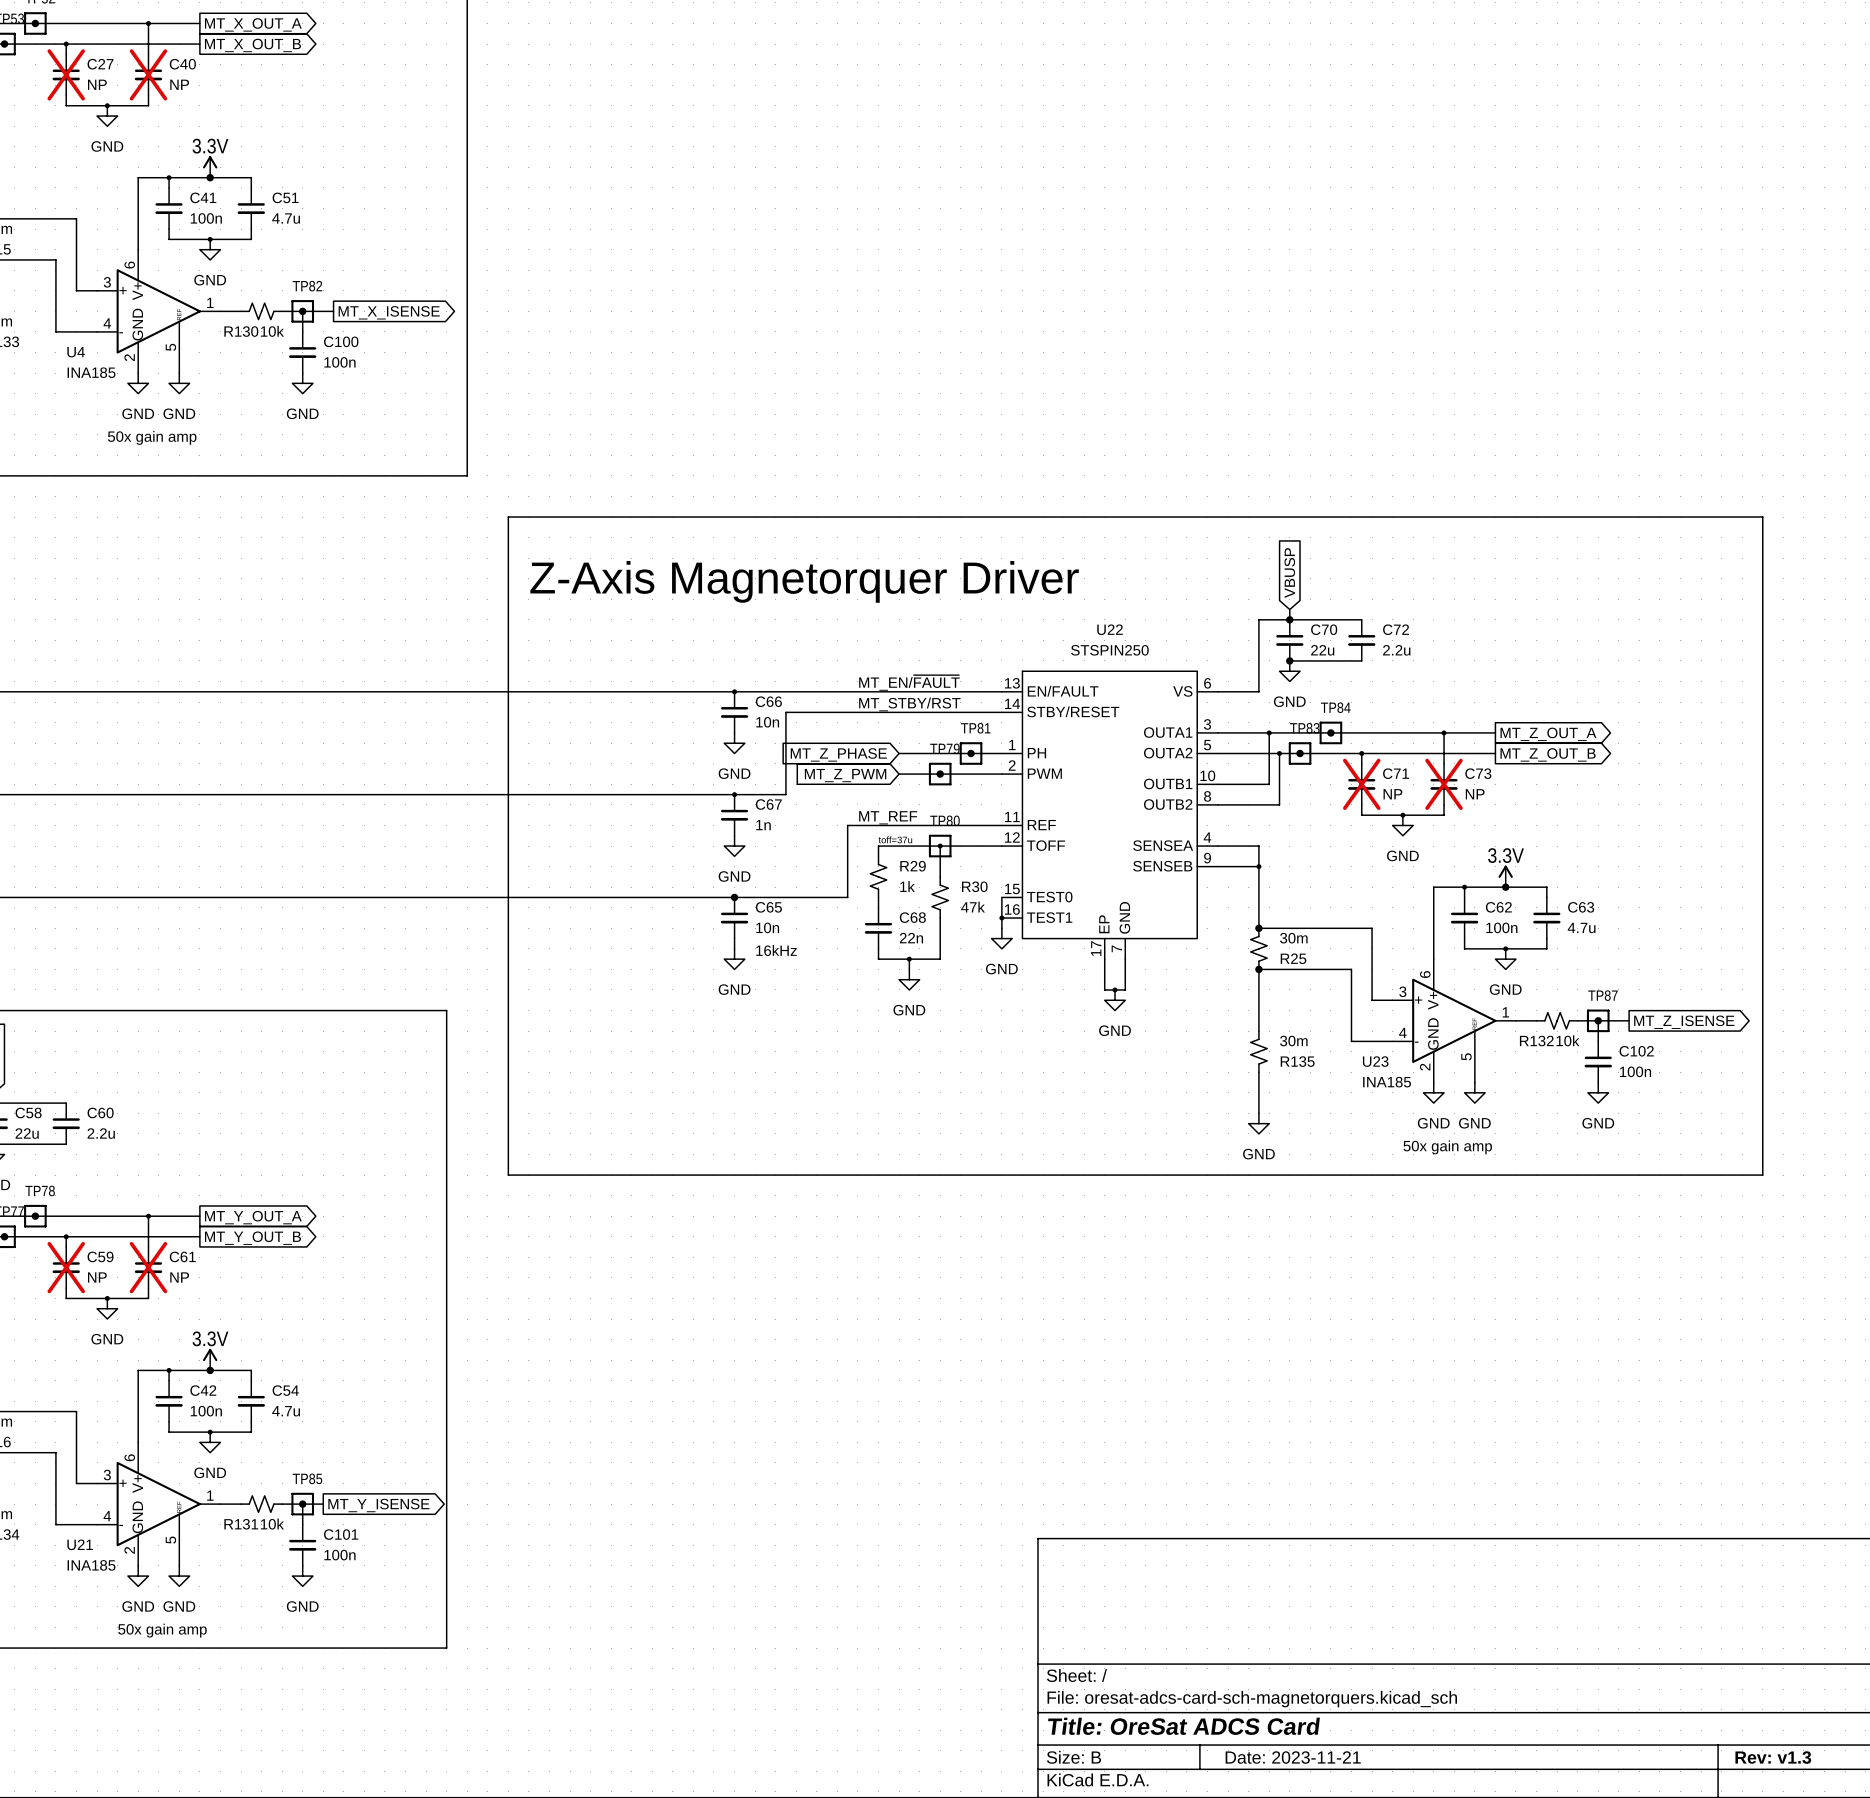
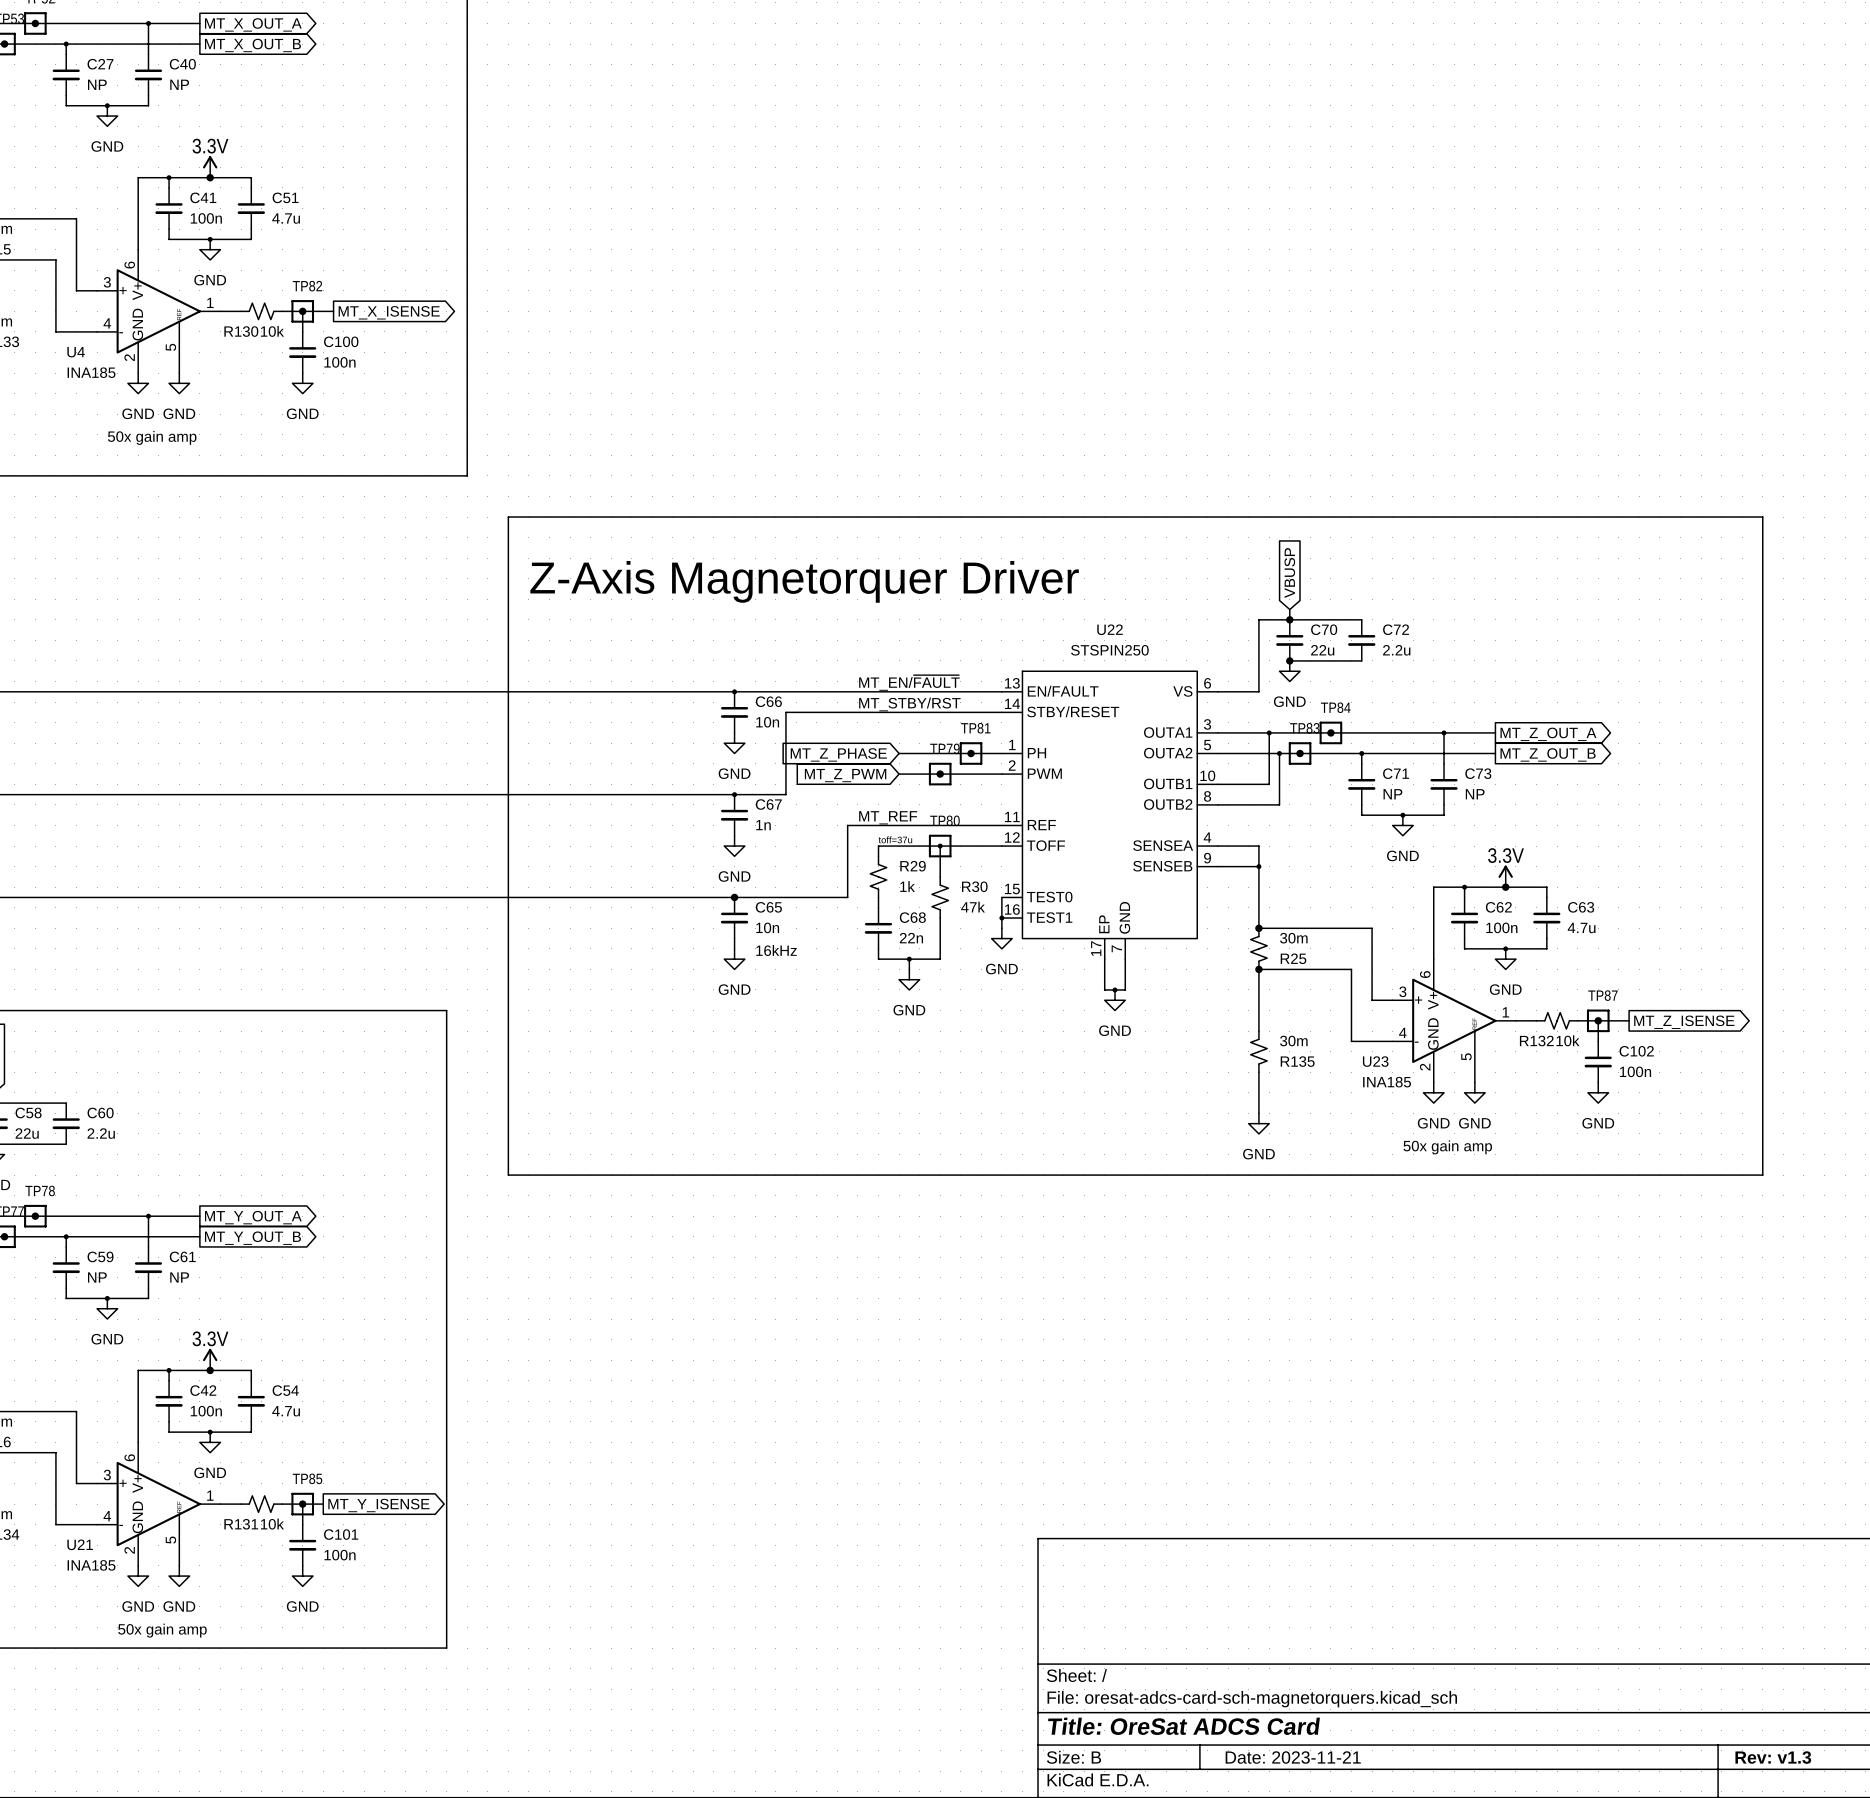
C27 do-not-place cross: (66, 74) -> none
C40 do-not-place cross: (148, 74) -> none
C71 do-not-place cross: (1361, 784) -> none
C73 do-not-place cross: (1444, 784) -> none
C59 do-not-place cross: (66, 1267) -> none
C61 do-not-place cross: (148, 1267) -> none

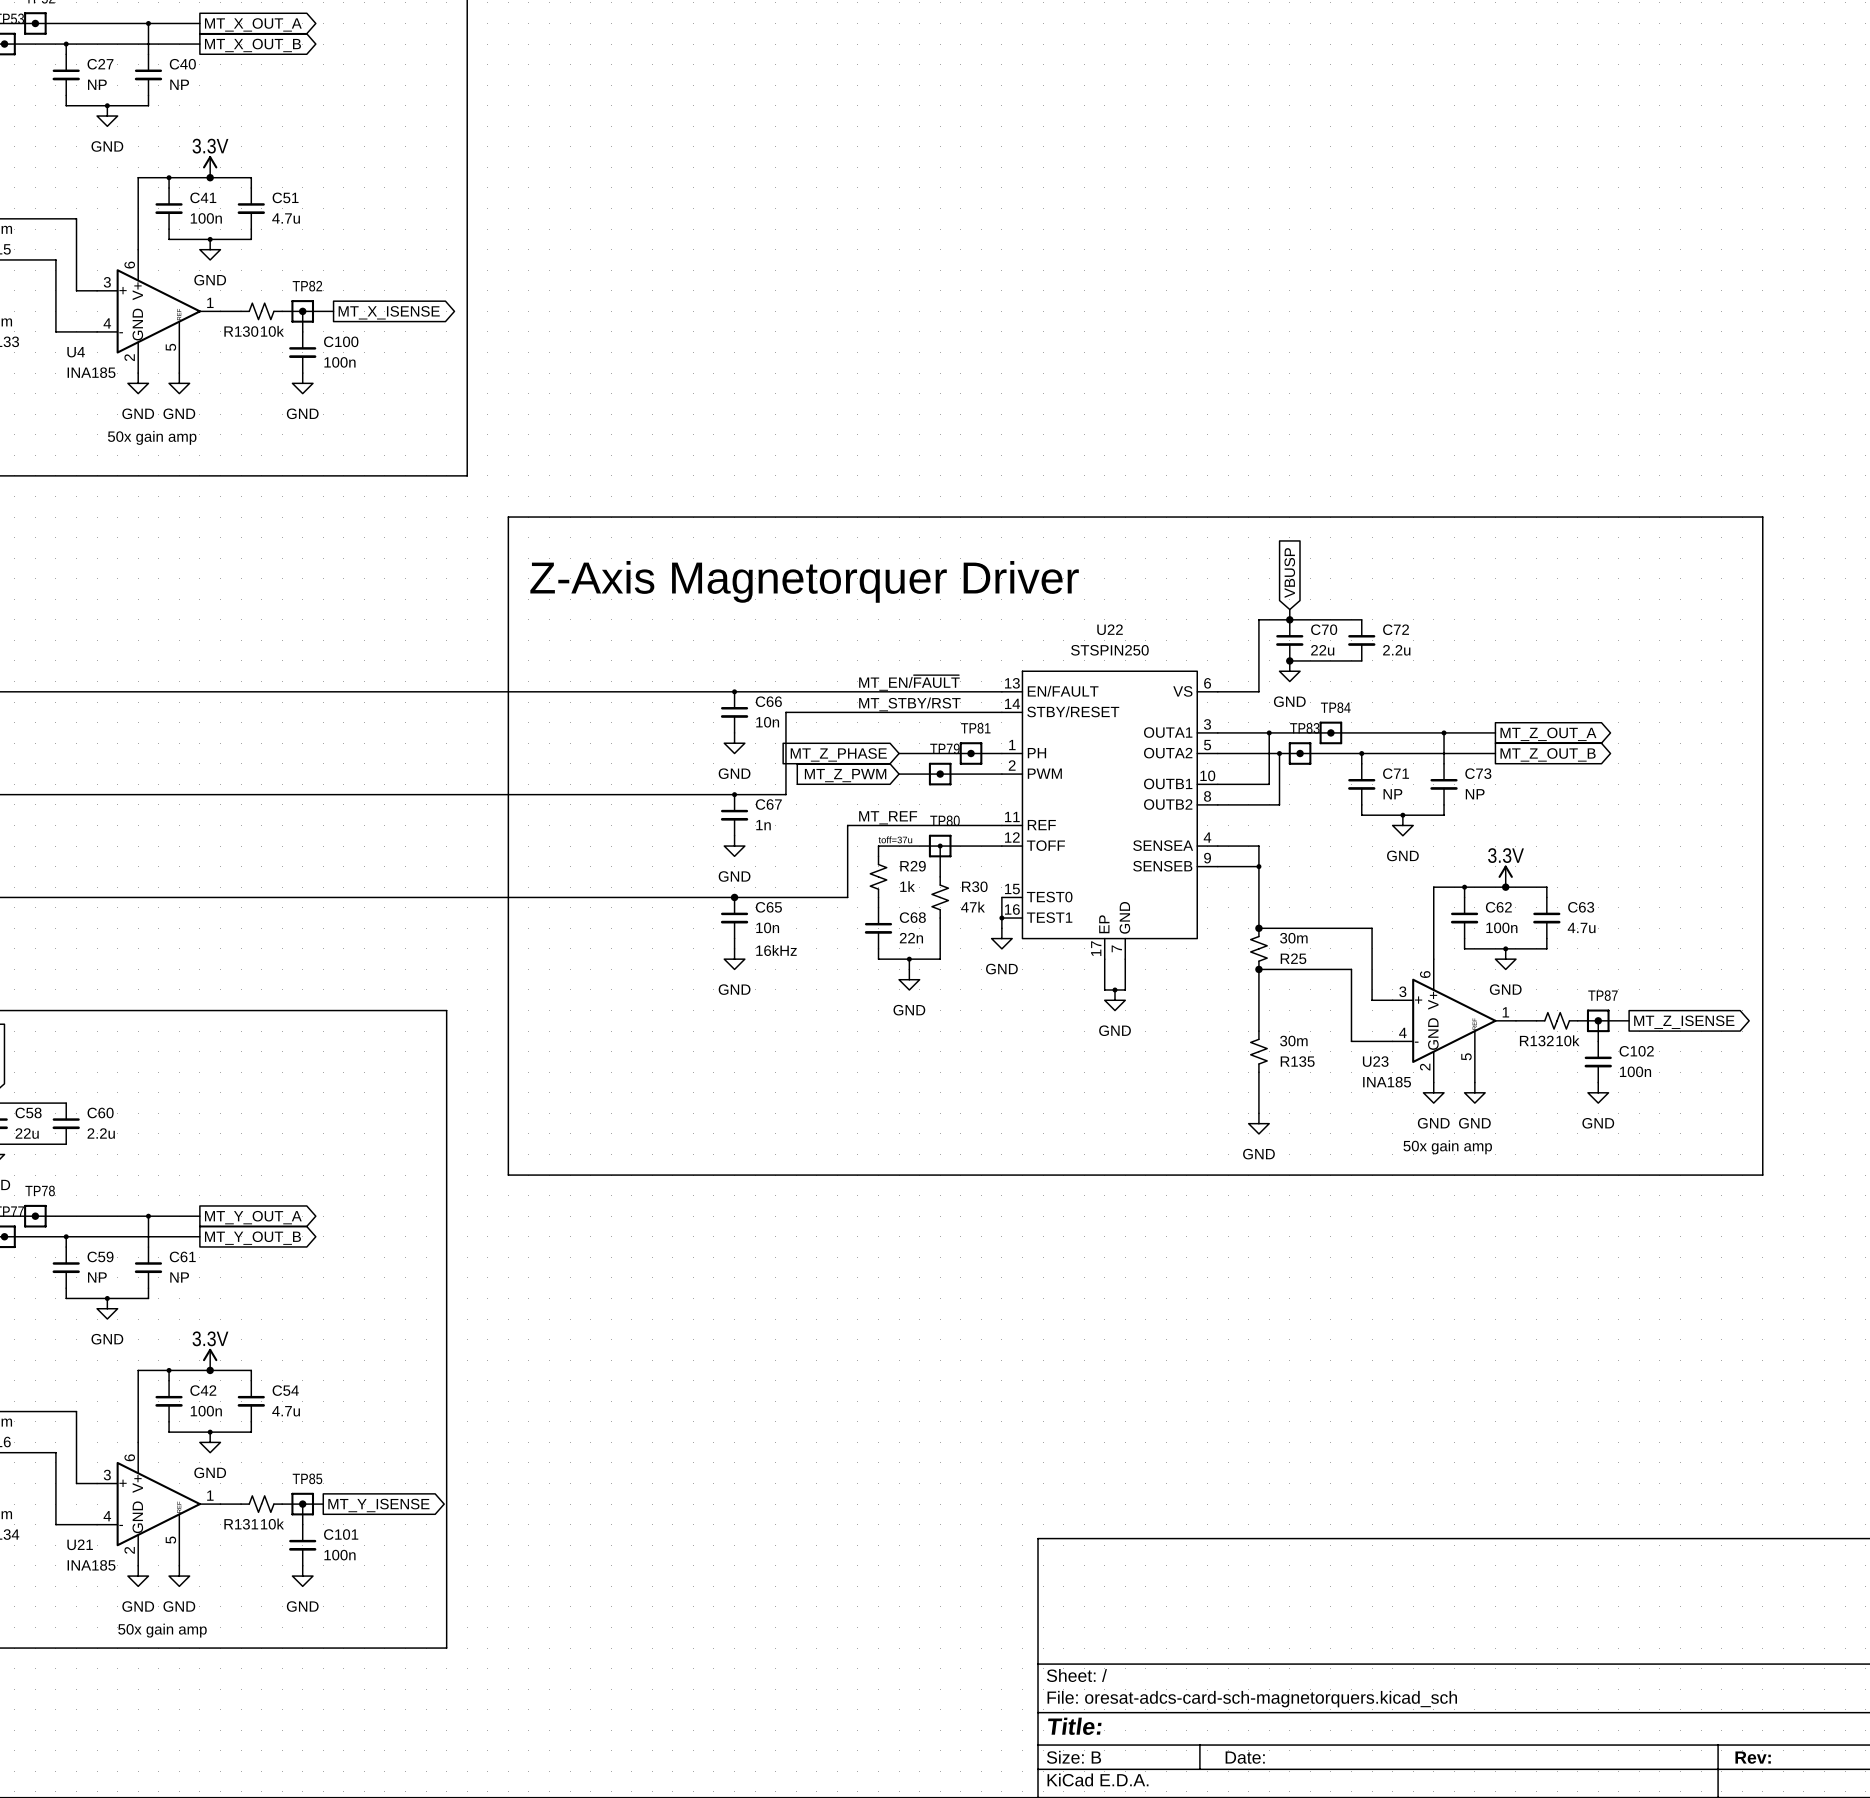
title block: Title: OreSat ADCS Card (1183, 1726) -> Title: (1074, 1726)
title block: Date: 2023-11-21 (1293, 1757) -> Date: (1245, 1757)
title block: Rev: v1.3 (1773, 1757) -> Rev: (1753, 1757)

